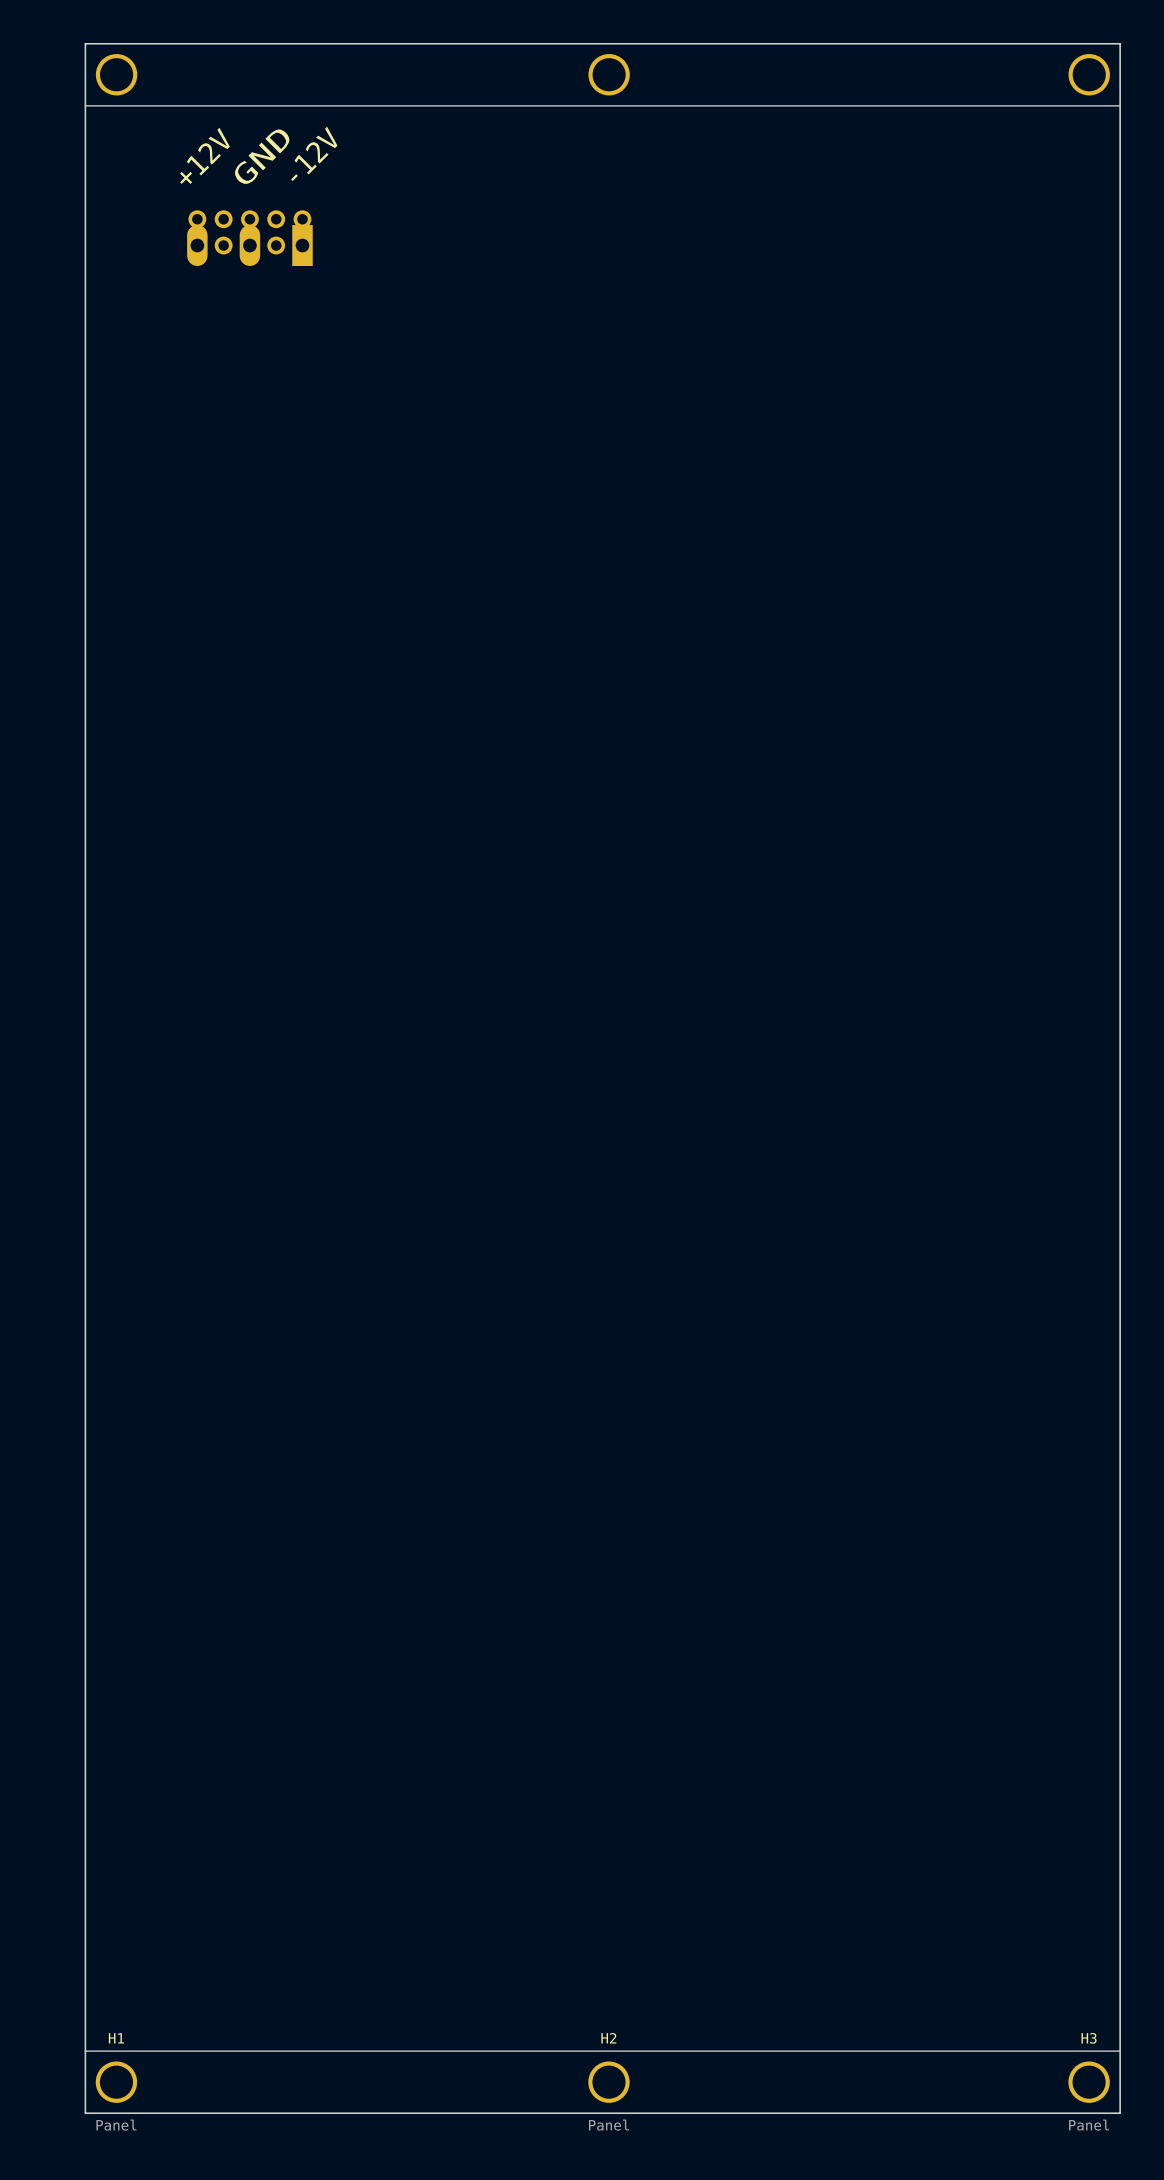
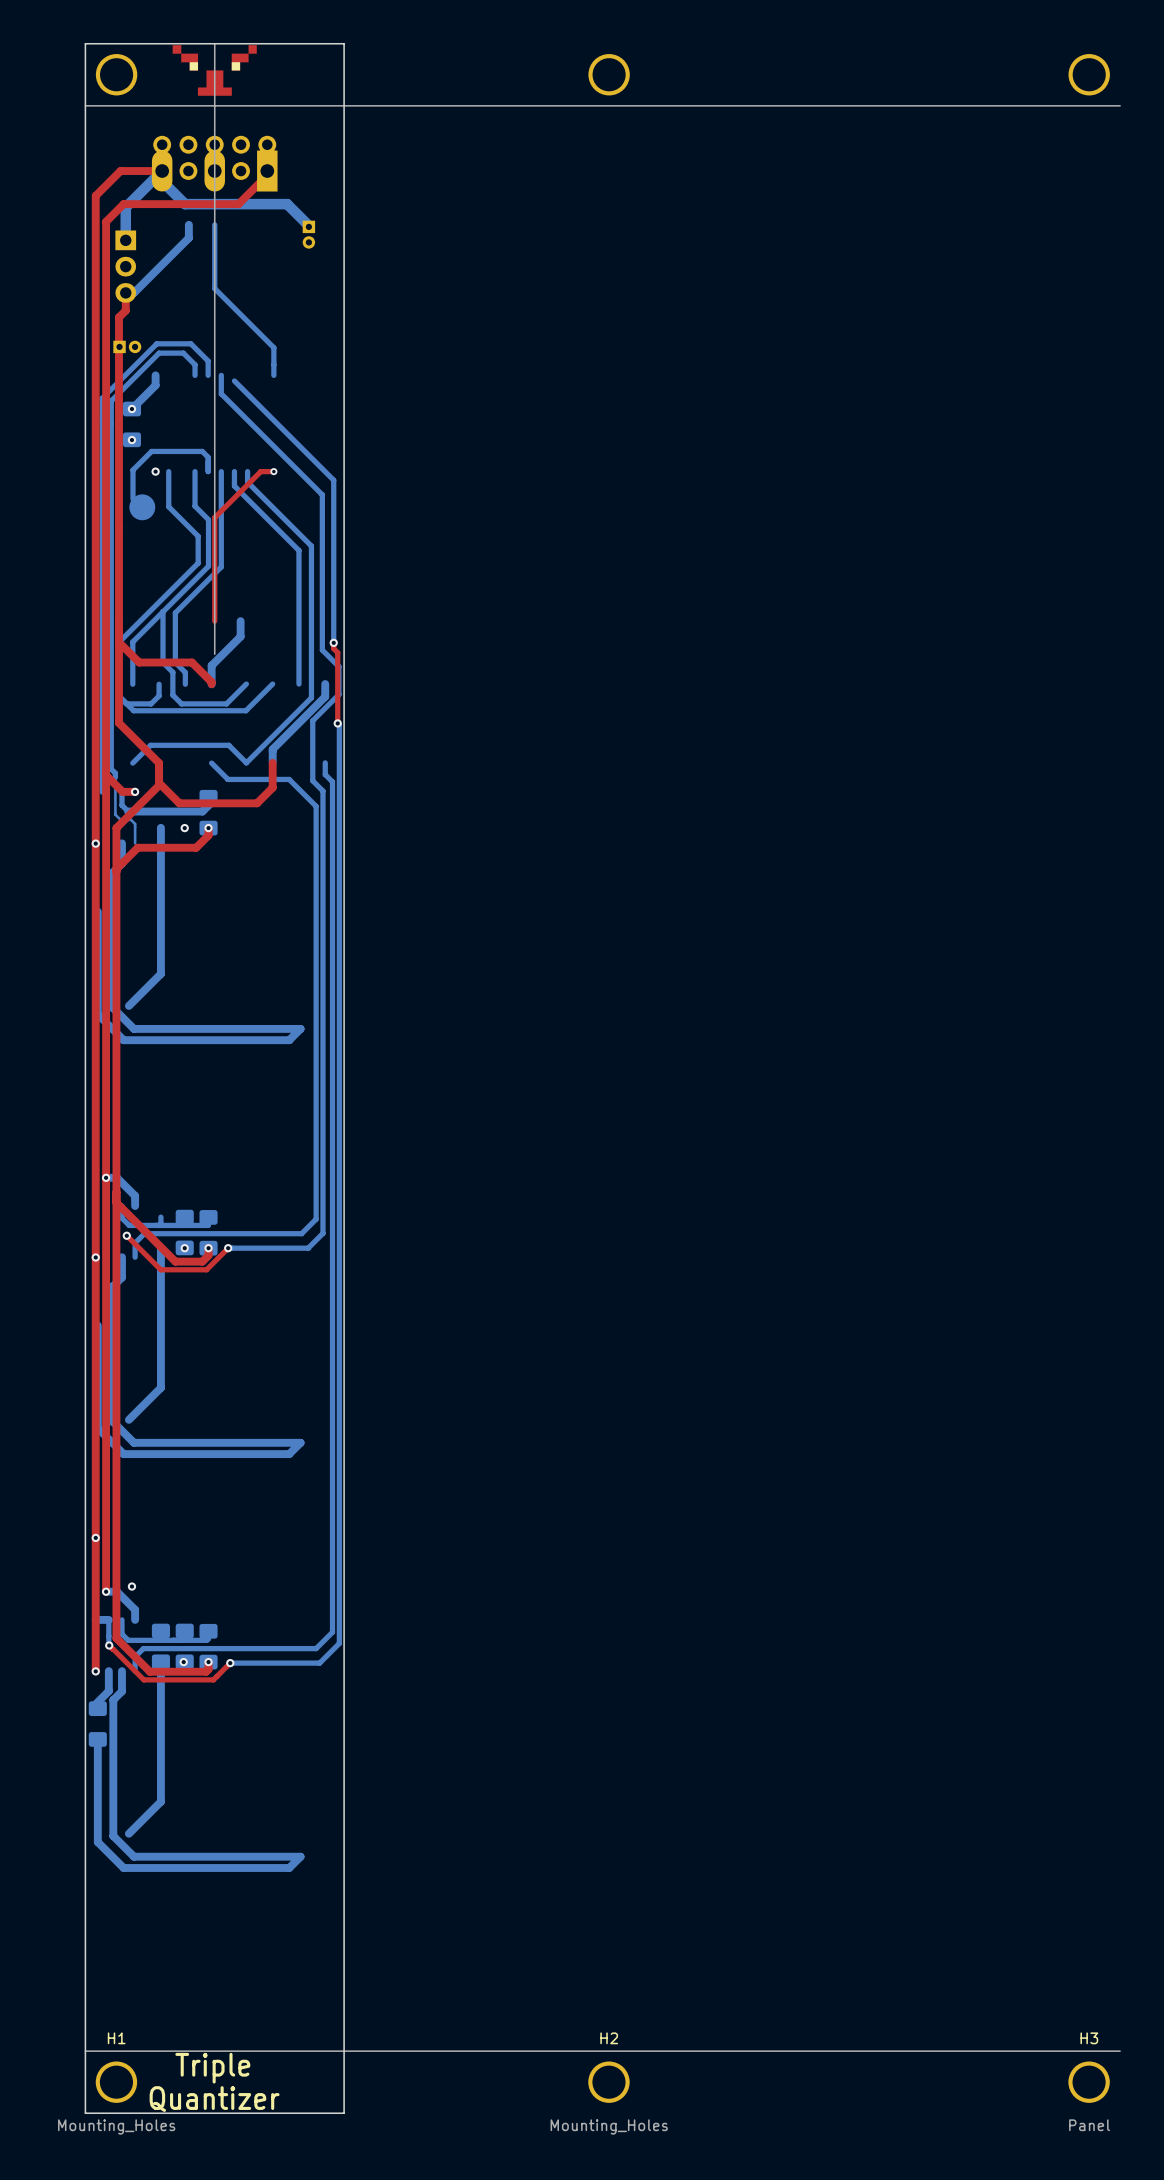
line: none -> (214, 43) (214, 654)
board edge: (344, 43) (1120, 43) (1120, 2113) (344, 2113) -> (344, 43) (344, 2113)
drawing: none -> [172, 45, 257, 96]
top track: none -> (162, 144) (162, 171) (120, 171) (95, 195) (95, 1671)
text: -12V (314, 153) -> none
text: +12V (204, 155) -> none
text: GND (262, 156) -> none
top track: none -> (269, 173) (238, 204) (123, 204) (106, 221) (106, 1591)
bottom track: none -> (188, 224) (188, 238) (133, 292) (125, 292)
bottom track: none -> (214, 224) (214, 288) (273, 347) (273, 375)
bottom track: none -> (308, 226) (287, 204) (185, 204) (162, 181) (162, 171) (125, 207) (125, 240)
part: none -> (308, 234)
part position: (249, 238) -> (214, 163)
part: none -> (125, 266)
top track: none -> (125, 292) (125, 310) (118, 317) (118, 723) (159, 763) (159, 785) (116, 828) (116, 1638) (149, 1671) (206, 1671) (208, 1669) (208, 1662)
part: none -> (127, 346)
bottom track: none -> (155, 375) (155, 385) (131, 409)
bottom track: none -> (195, 375) (195, 364) (183, 353) (159, 353) (111, 400) (111, 769) (115, 773) (115, 814) (120, 819) (130, 819) (135, 823) (135, 843)
bottom track: none -> (208, 375) (208, 361) (190, 343) (156, 343) (102, 398) (102, 792)
bottom track: none -> (221, 375) (221, 393) (322, 494) (322, 650) (338, 666) (338, 694) (312, 720) (312, 780) (322, 791) (322, 1233) (308, 1248) (228, 1248)
bottom track: none -> (234, 380) (333, 480) (333, 642)
via: none -> (131, 409)
part: none -> (131, 424)
via: none -> (131, 440)
via: none -> (155, 471)
bottom track: none -> (168, 471) (168, 506) (198, 536) (198, 563) (118, 642) (118, 695) (133, 710) (245, 710) (272, 684)
bottom track: none -> (195, 471) (195, 506) (208, 519) (208, 566) (132, 642) (132, 684)
bottom track: none -> (208, 471) (208, 457) (202, 451) (151, 451) (132, 470) (132, 499)
bottom track: none -> (221, 471) (221, 566) (175, 612) (175, 662) (185, 672) (185, 684)
bottom track: none -> (234, 471) (234, 486) (298, 550) (298, 684)
bottom track: none -> (247, 471) (247, 482) (311, 546) (311, 697) (246, 762) (228, 745) (150, 745) (132, 763)
top track: none -> (273, 471) (260, 471) (214, 517) (214, 621)
via: none -> (273, 471)
part: none -> (142, 507)
bottom track: none -> (163, 611) (163, 662) (172, 672) (172, 695) (181, 703) (226, 703) (246, 684)
bottom track: none -> (240, 621) (240, 636) (211, 665) (211, 684)
top track: none -> (118, 642) (139, 662) (191, 662) (211, 684)
top track: none -> (333, 642) (333, 648) (337, 652) (337, 723)
via: none -> (333, 642)
bottom track: none -> (159, 684) (159, 695) (151, 703) (126, 703)
bottom track: none -> (325, 684) (325, 696) (272, 749) (272, 762)
bottom track: none -> (337, 723) (339, 725) (339, 1643) (319, 1663) (230, 1663)
via: none -> (337, 723)
top track: none -> (272, 762) (272, 787) (257, 803) (179, 803) (159, 782)
bottom track: none -> (325, 762) (325, 774) (332, 781) (332, 1632) (316, 1648) (143, 1648) (135, 1656) (135, 1671)
bottom track: none -> (211, 763) (227, 779) (289, 779) (316, 806) (316, 1219) (301, 1233) (144, 1233) (135, 1243) (135, 1257)
top track: none -> (106, 775) (122, 791) (135, 791)
via: none -> (135, 791)
bottom track: none -> (121, 792) (121, 805) (128, 811) (202, 811) (209, 804) (209, 797)
part: none -> (208, 812)
bottom track: none -> (160, 827) (160, 973) (128, 1005)
via: none -> (184, 828)
top track: none -> (208, 828) (208, 835) (196, 847) (137, 847) (116, 869)
via: none -> (208, 828)
via: none -> (95, 843)
bottom track: none -> (121, 843) (121, 863) (113, 872) (113, 1008) (133, 1028) (300, 1028) (289, 1040) (123, 1040) (97, 1014) (97, 911)
bottom track: none -> (106, 1177) (117, 1177) (135, 1195) (135, 1206)
via: none -> (106, 1177)
top track: none -> (116, 1202) (175, 1261) (202, 1261) (208, 1255) (208, 1248)
bottom track: none -> (121, 1206) (121, 1218) (129, 1225) (207, 1225) (208, 1217)
bottom track: none -> (160, 1217) (160, 1225)
part: none -> (184, 1232)
part: none -> (208, 1232)
top track: none -> (126, 1235) (160, 1269) (206, 1269) (228, 1248)
via: none -> (126, 1235)
bottom track: none -> (160, 1248) (160, 1387) (128, 1419)
via: none -> (184, 1248)
via: none -> (208, 1248)
via: none -> (228, 1248)
via: none -> (95, 1257)
bottom track: none -> (121, 1257) (121, 1277) (113, 1286) (113, 1422) (133, 1442) (300, 1442) (289, 1454) (123, 1454) (97, 1428) (97, 1325)
via: none -> (95, 1537)
via: none -> (131, 1586)
bottom track: none -> (106, 1591) (117, 1591) (135, 1609) (135, 1619)
via: none -> (106, 1591)
bottom track: none -> (95, 1619) (108, 1619) (109, 1645)
bottom track: none -> (121, 1619) (121, 1634) (128, 1640) (206, 1640) (208, 1631)
top track: none -> (109, 1645) (143, 1679) (213, 1679) (230, 1663)
via: none -> (109, 1645)
part: none -> (160, 1646)
part: none -> (184, 1646)
part: none -> (208, 1646)
bottom track: none -> (160, 1661) (160, 1801) (128, 1833)
via: none -> (183, 1662)
via: none -> (208, 1662)
via: none -> (230, 1663)
via: none -> (95, 1671)
bottom track: none -> (108, 1671) (108, 1691) (94, 1705)
bottom track: none -> (121, 1671) (121, 1691) (113, 1700) (113, 1836) (133, 1856) (300, 1856) (289, 1867) (123, 1867) (97, 1842) (97, 1739)
part: none -> (97, 1724)
text: none -> Triple (212, 2068)
text: none -> Quantizer (214, 2099)
H1 value: Panel (116, 2125) -> Mounting_Holes (116, 2126)
H2 value: Panel (608, 2125) -> Mounting_Holes (609, 2126)

